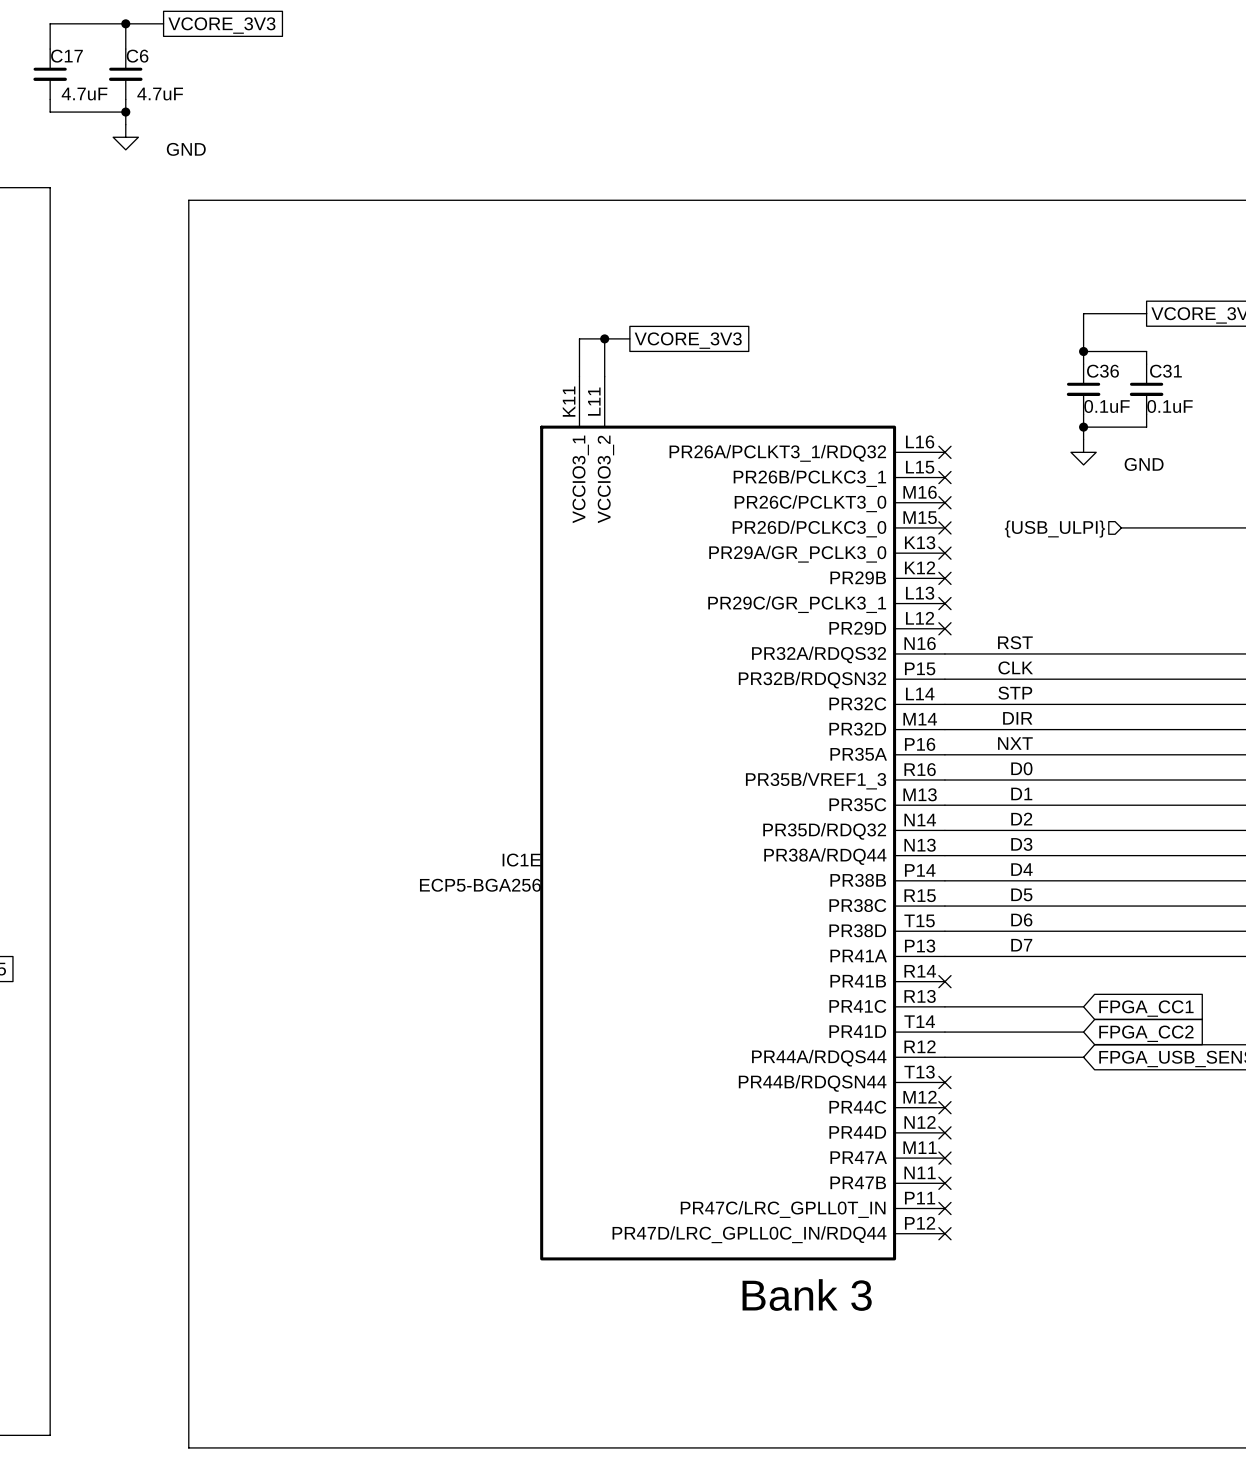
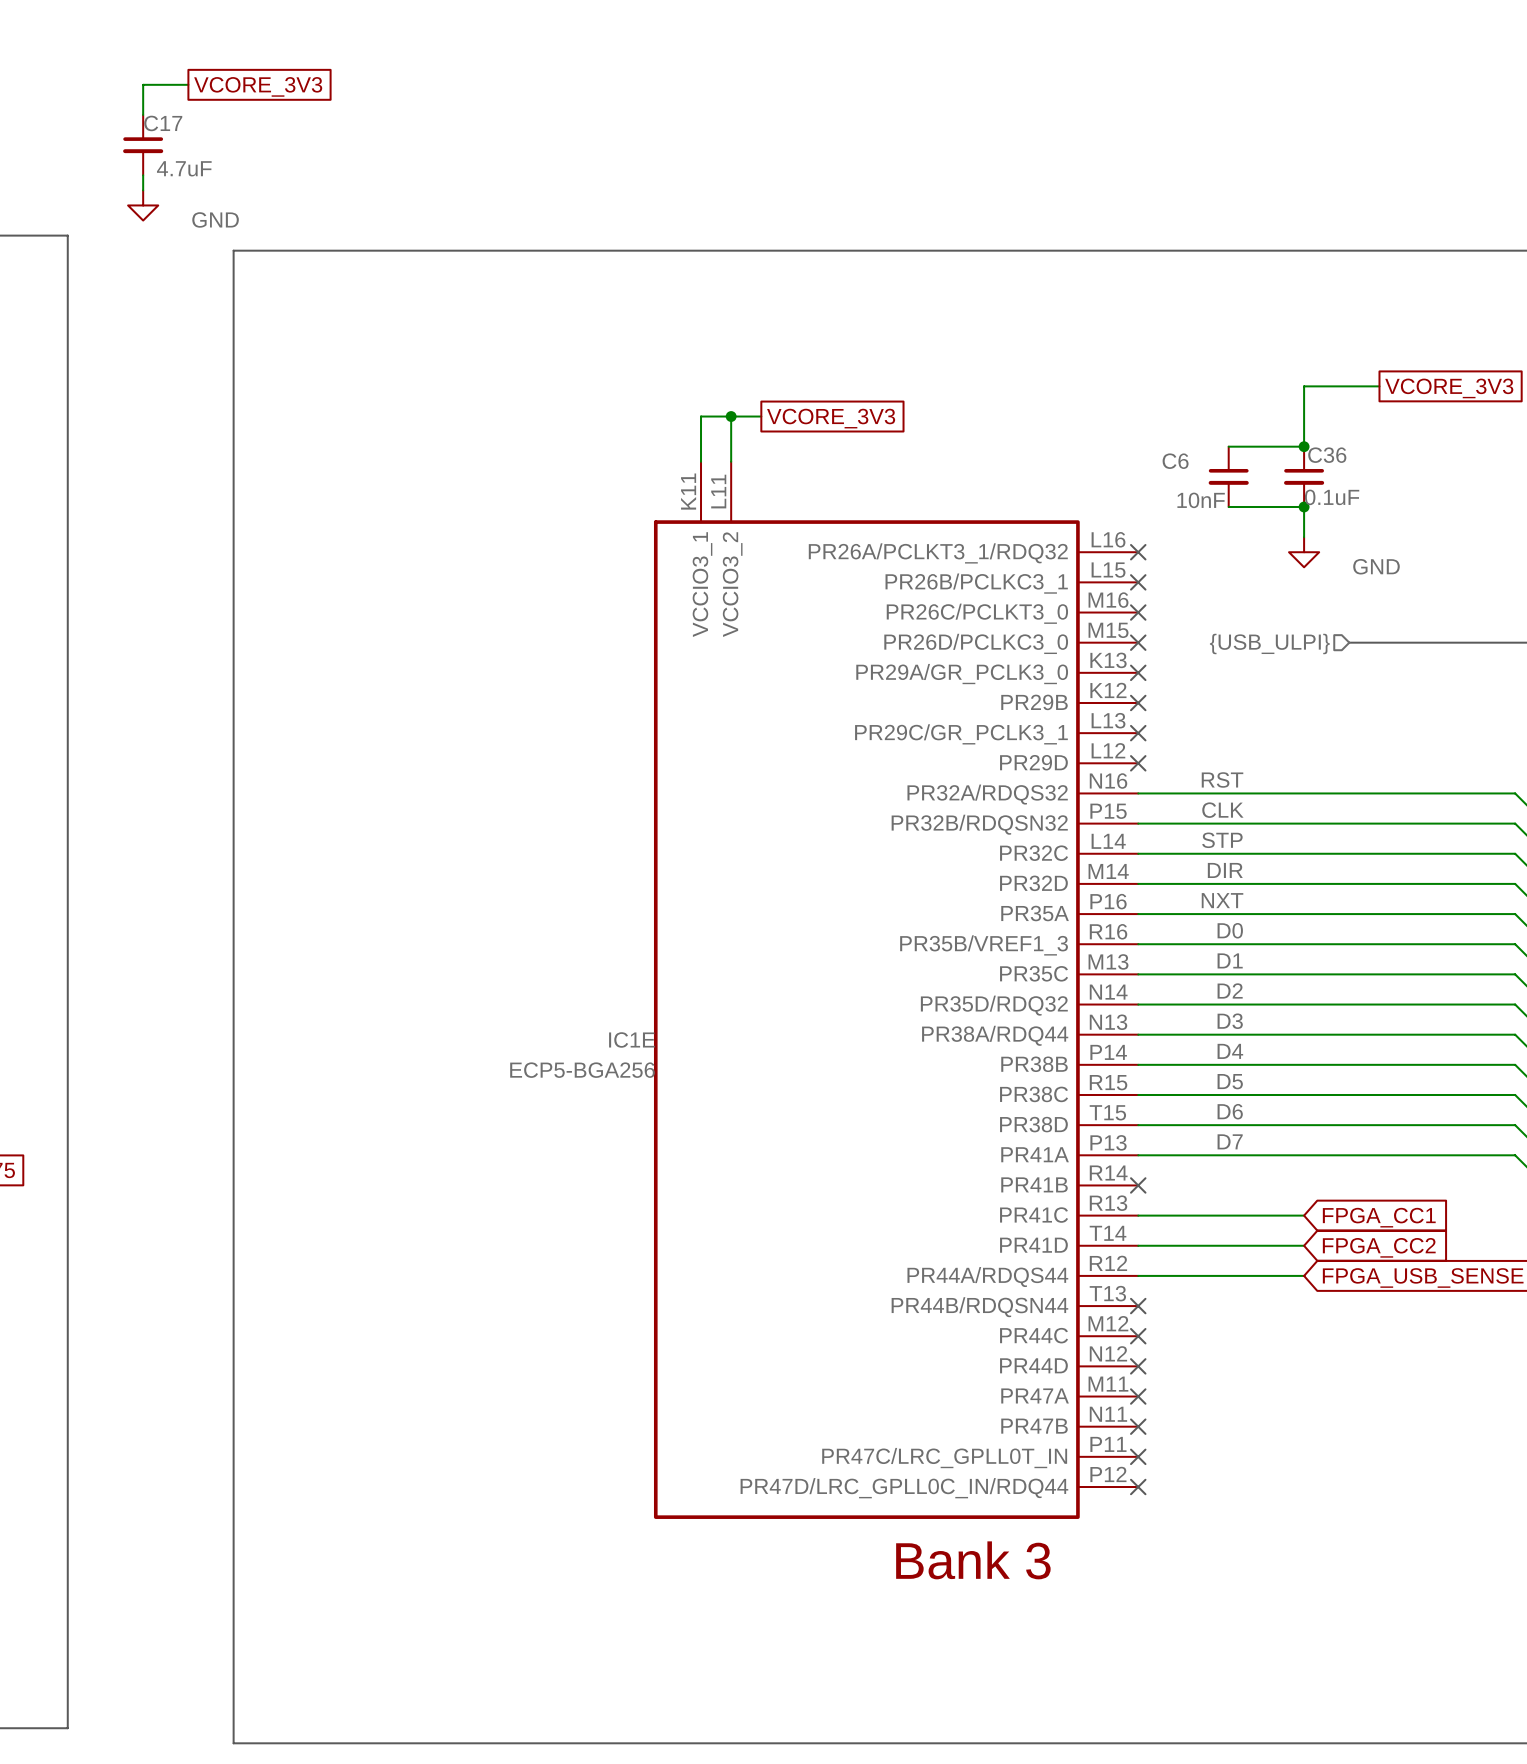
wire: (125, 23) (125, 49) -> none
junction: (125, 23) -> none
wire: (163, 23) (50, 23) (50, 49) -> none
global label position: VCORE_3V3 (221, 25) -> VCORE_3V3 (258, 86)
C6 name position: C6 (137, 56) -> C6 (1175, 461)
wire: none -> (188, 84) (143, 84) (143, 114)
C17 position: (50, 74) -> (143, 145)
C6 position: (125, 74) -> (1228, 476)
C6 value: 4.7uF (160, 94) -> 10nF (1201, 500)
wire: (50, 99) (50, 112) (125, 112) -> none
wire: (125, 99) (125, 124) -> none
junction: (125, 112) -> none
wire: none -> (143, 175) (143, 190)
power symbol position: GND (125, 137) -> GND (143, 205)
wire: (1083, 351) (1146, 351) (1146, 364) -> none
junction position: (1083, 351) -> (1304, 446)
wire: none -> (1228, 446) (1304, 446)
C31: 0.1uF (1146, 389) -> none
wire: none -> (1228, 506) (1304, 506)
wire: (1146, 414) (1146, 427) (1083, 427) -> none
junction position: (1083, 427) -> (1304, 506)

